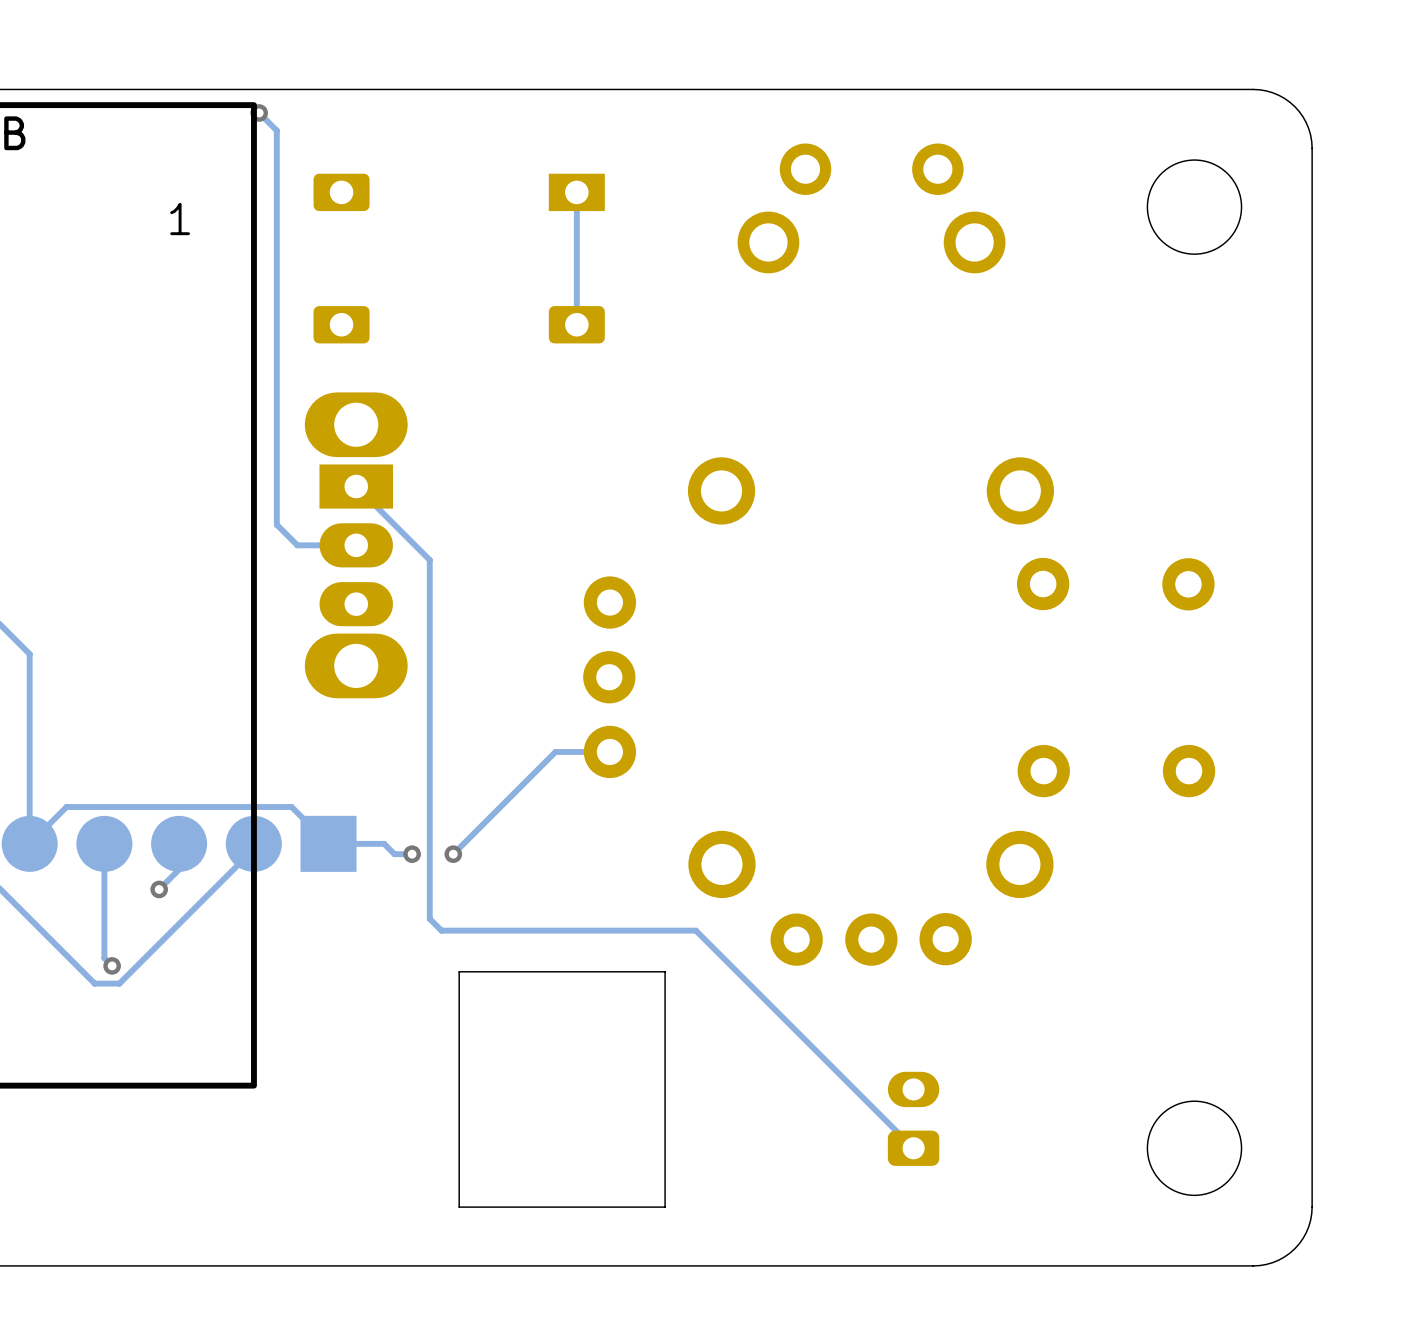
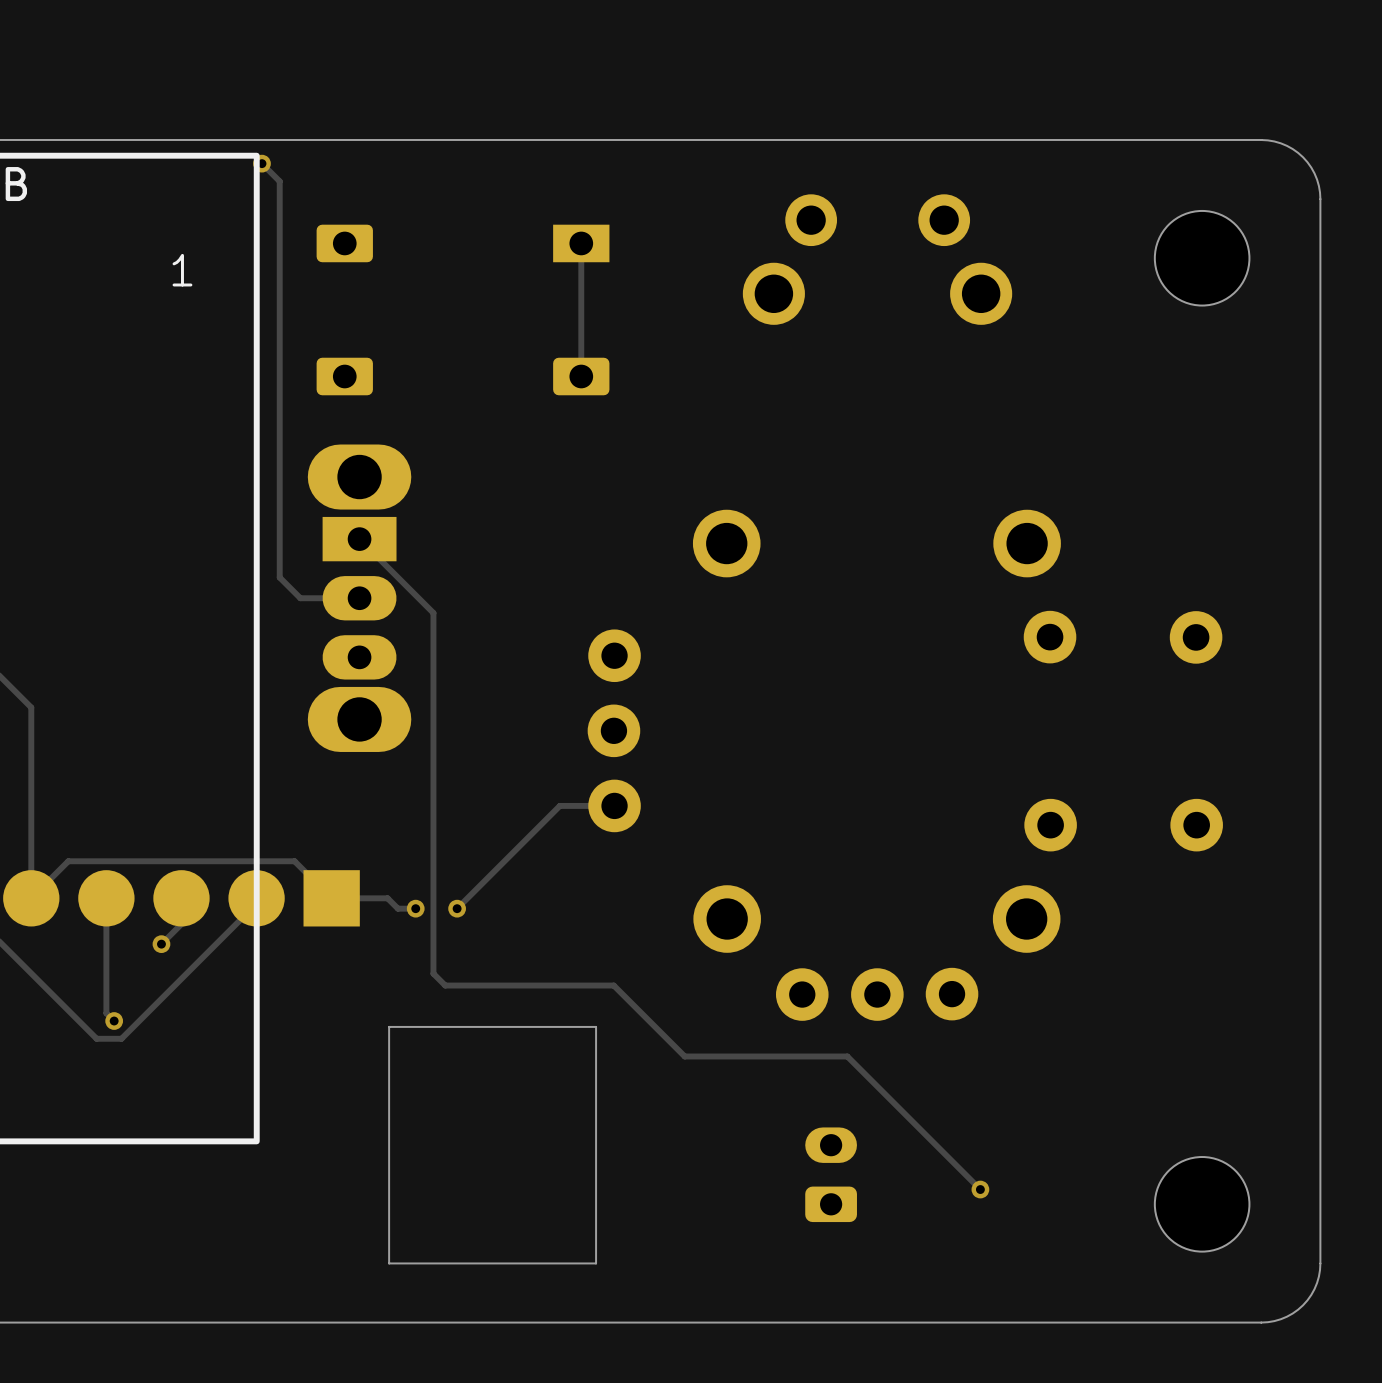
track: (609, 930) (695, 930) (913, 1148) -> (613, 985) (684, 1056) (847, 1056) (980, 1189)
board edge: (459, 971) (459, 1207) -> (463, 1026) (389, 1026) (389, 1263) (463, 1263)
board edge: (591, 971) (665, 971) (665, 1207) (591, 1207) -> (596, 1026) (596, 1263)
part position: (913, 1118) -> (831, 1174)
via: none -> (980, 1189)

